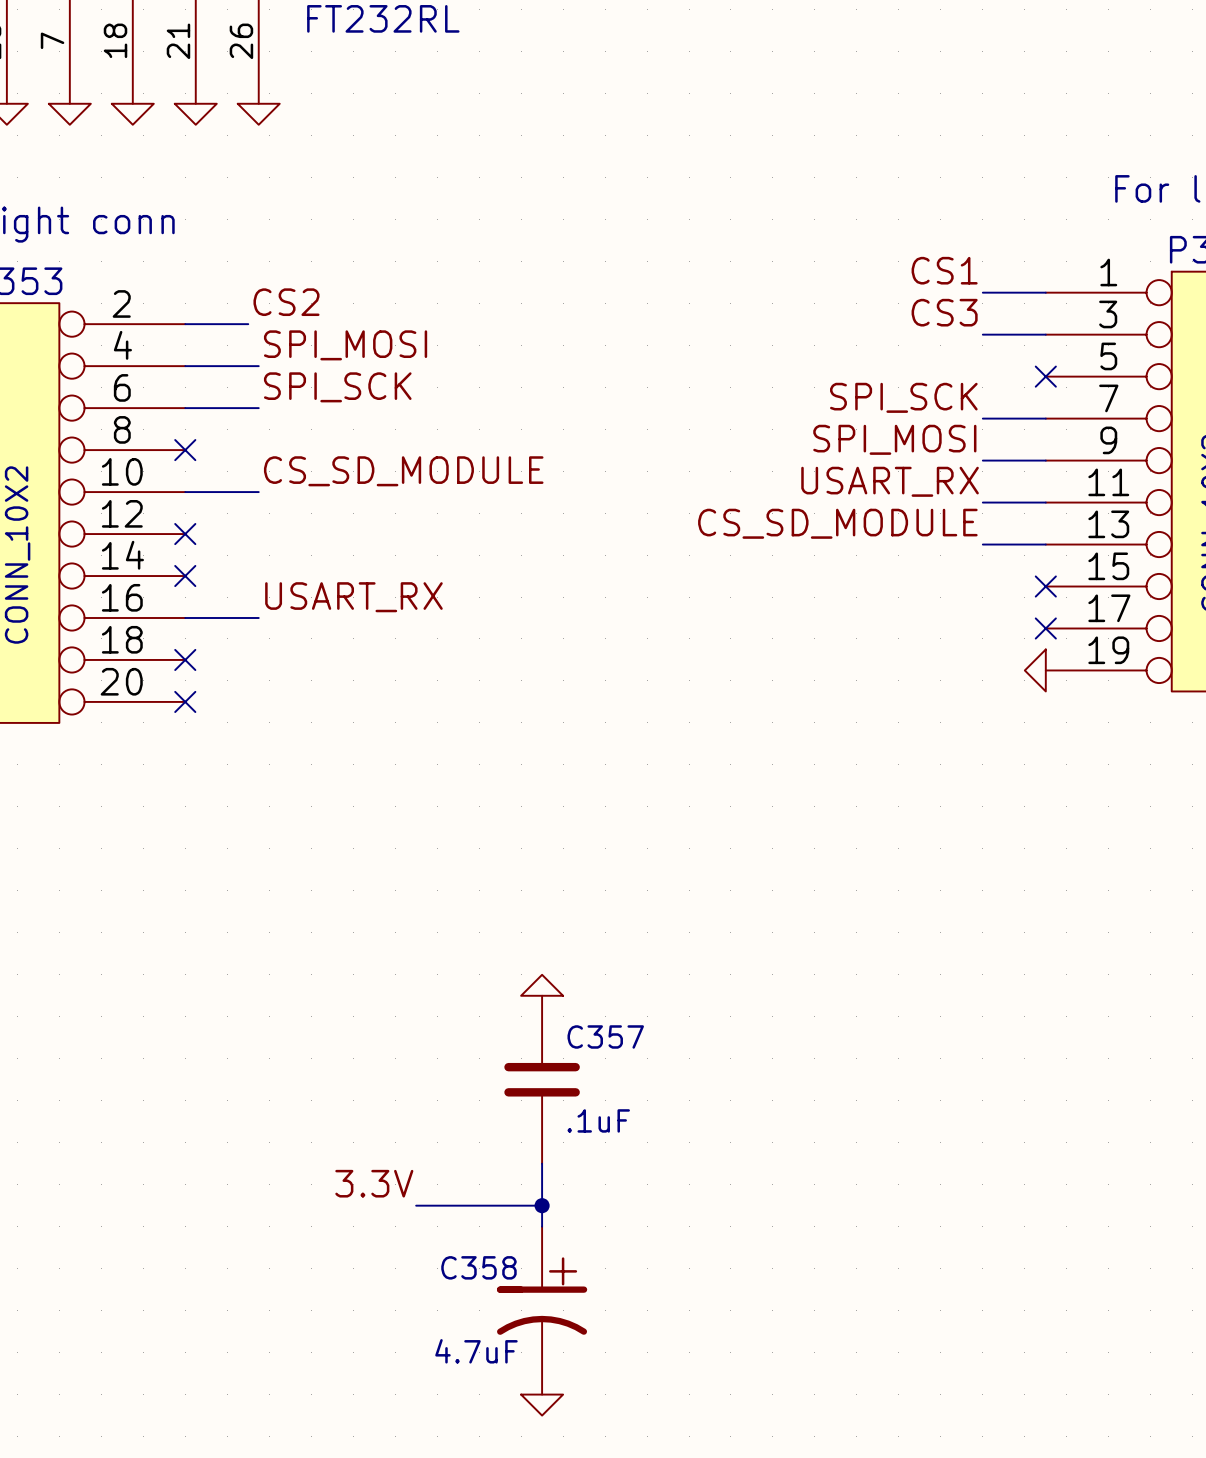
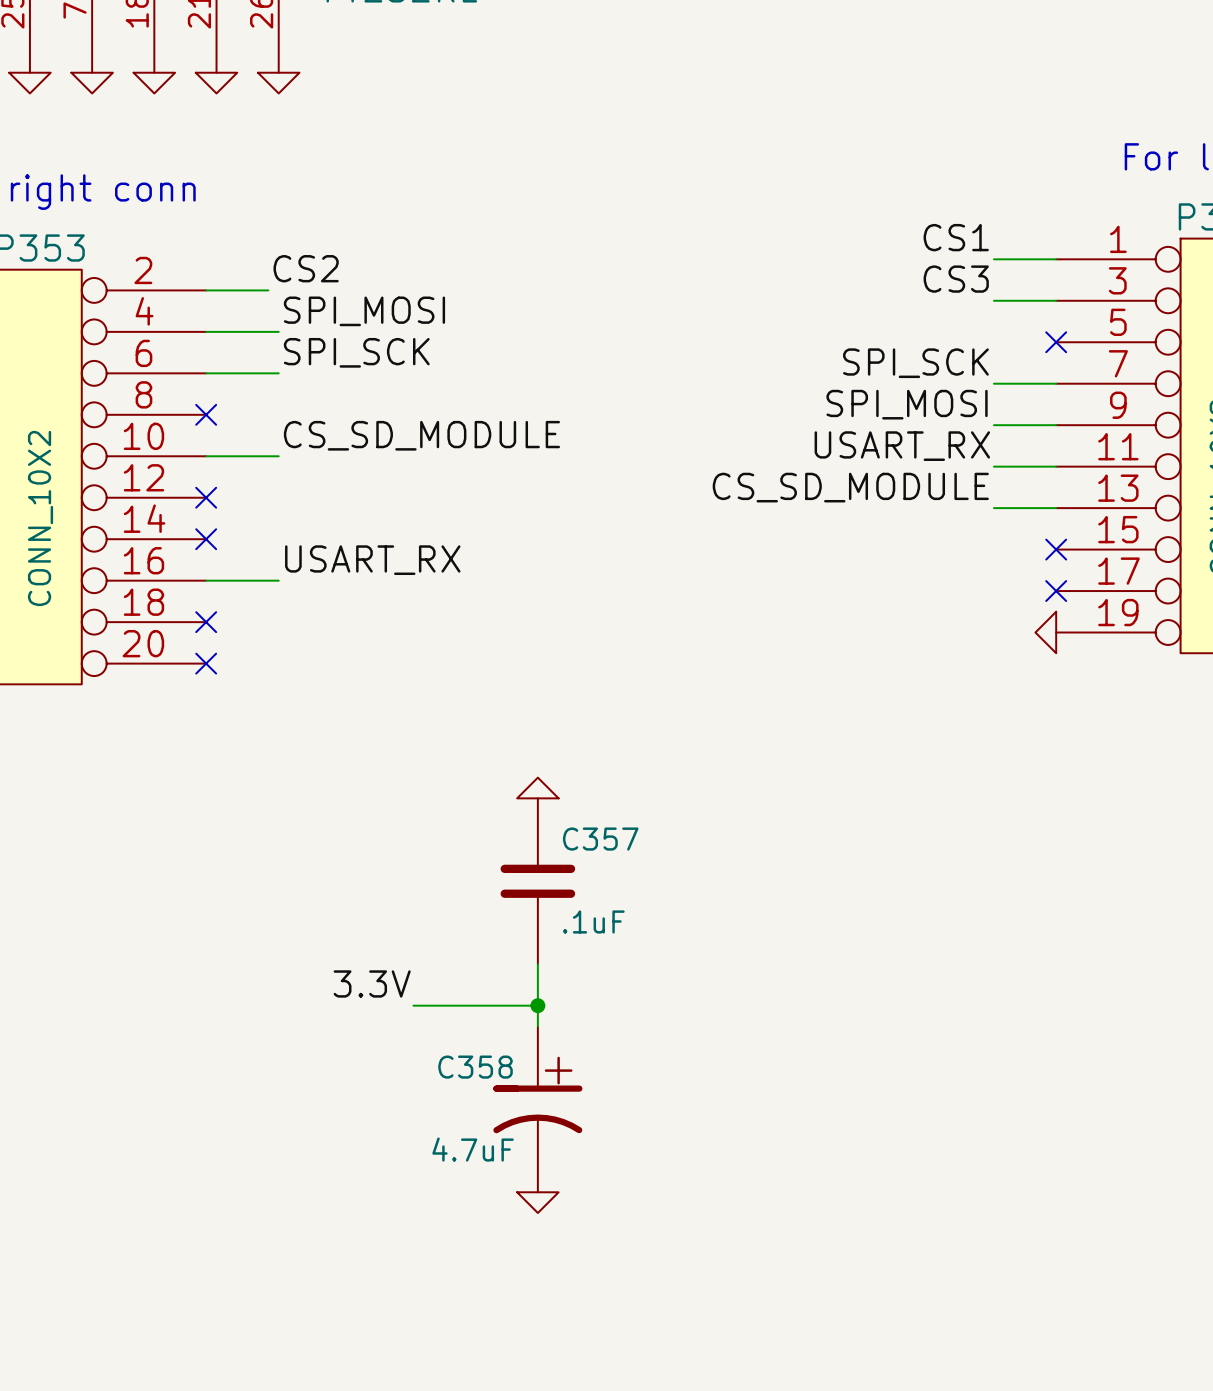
power symbol: none -> (537, 787)
power symbol: (542, 985) -> none
junction: none -> (537, 1005)
C357 position: (542, 1079) -> (537, 881)
wire: (542, 1163) (542, 1226) -> (537, 964) (537, 1026)
label position: 3.3V (374, 1183) -> 3.3V (372, 983)
wire: (416, 1205) (542, 1205) -> (413, 1005) (537, 1005)
junction: (542, 1205) -> none
power symbol: none -> (537, 1202)
C358 position: (542, 1310) -> (537, 1109)
power symbol: (542, 1405) -> none

